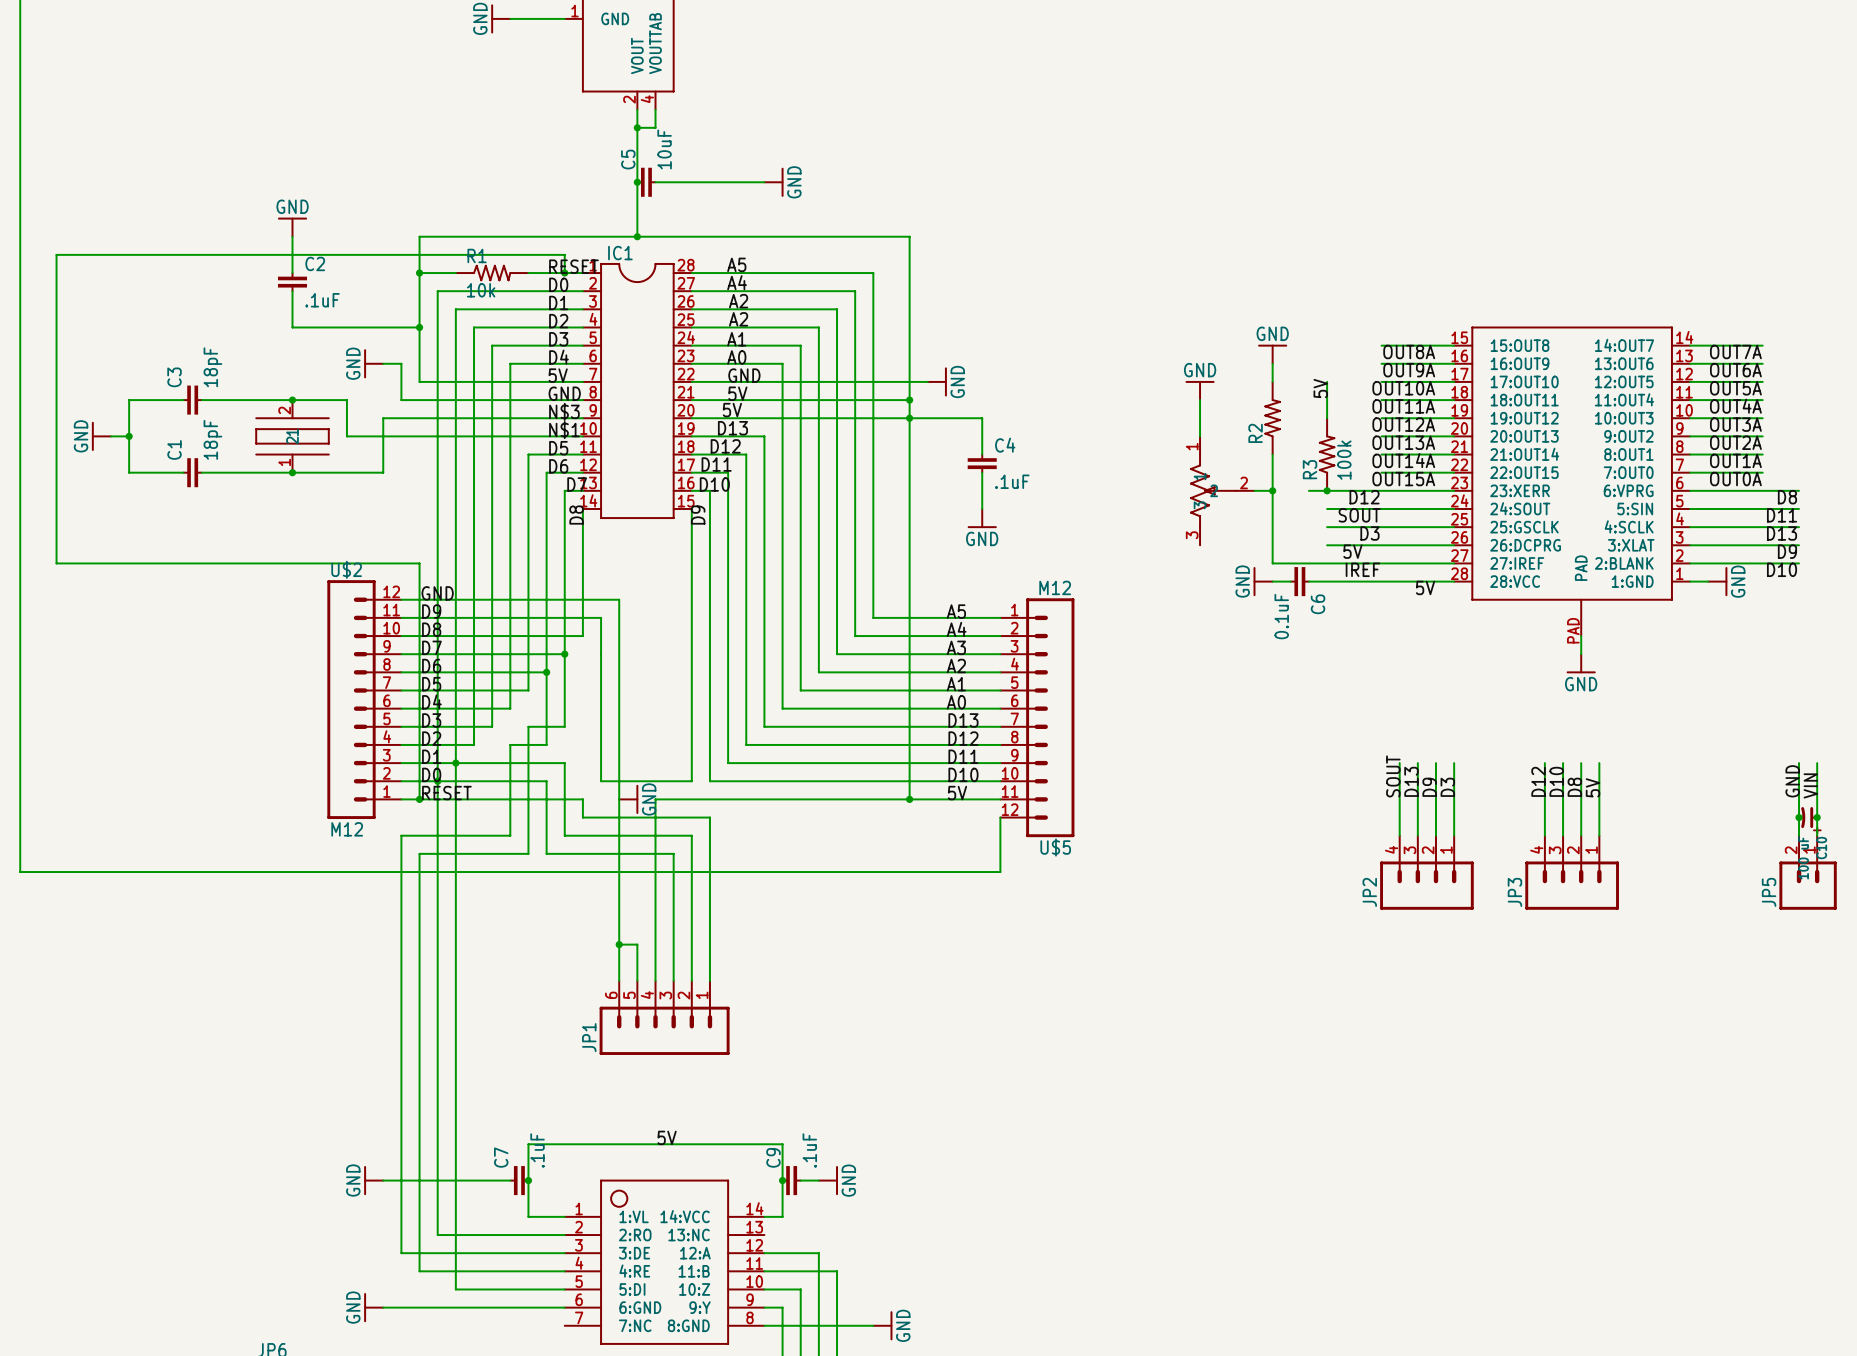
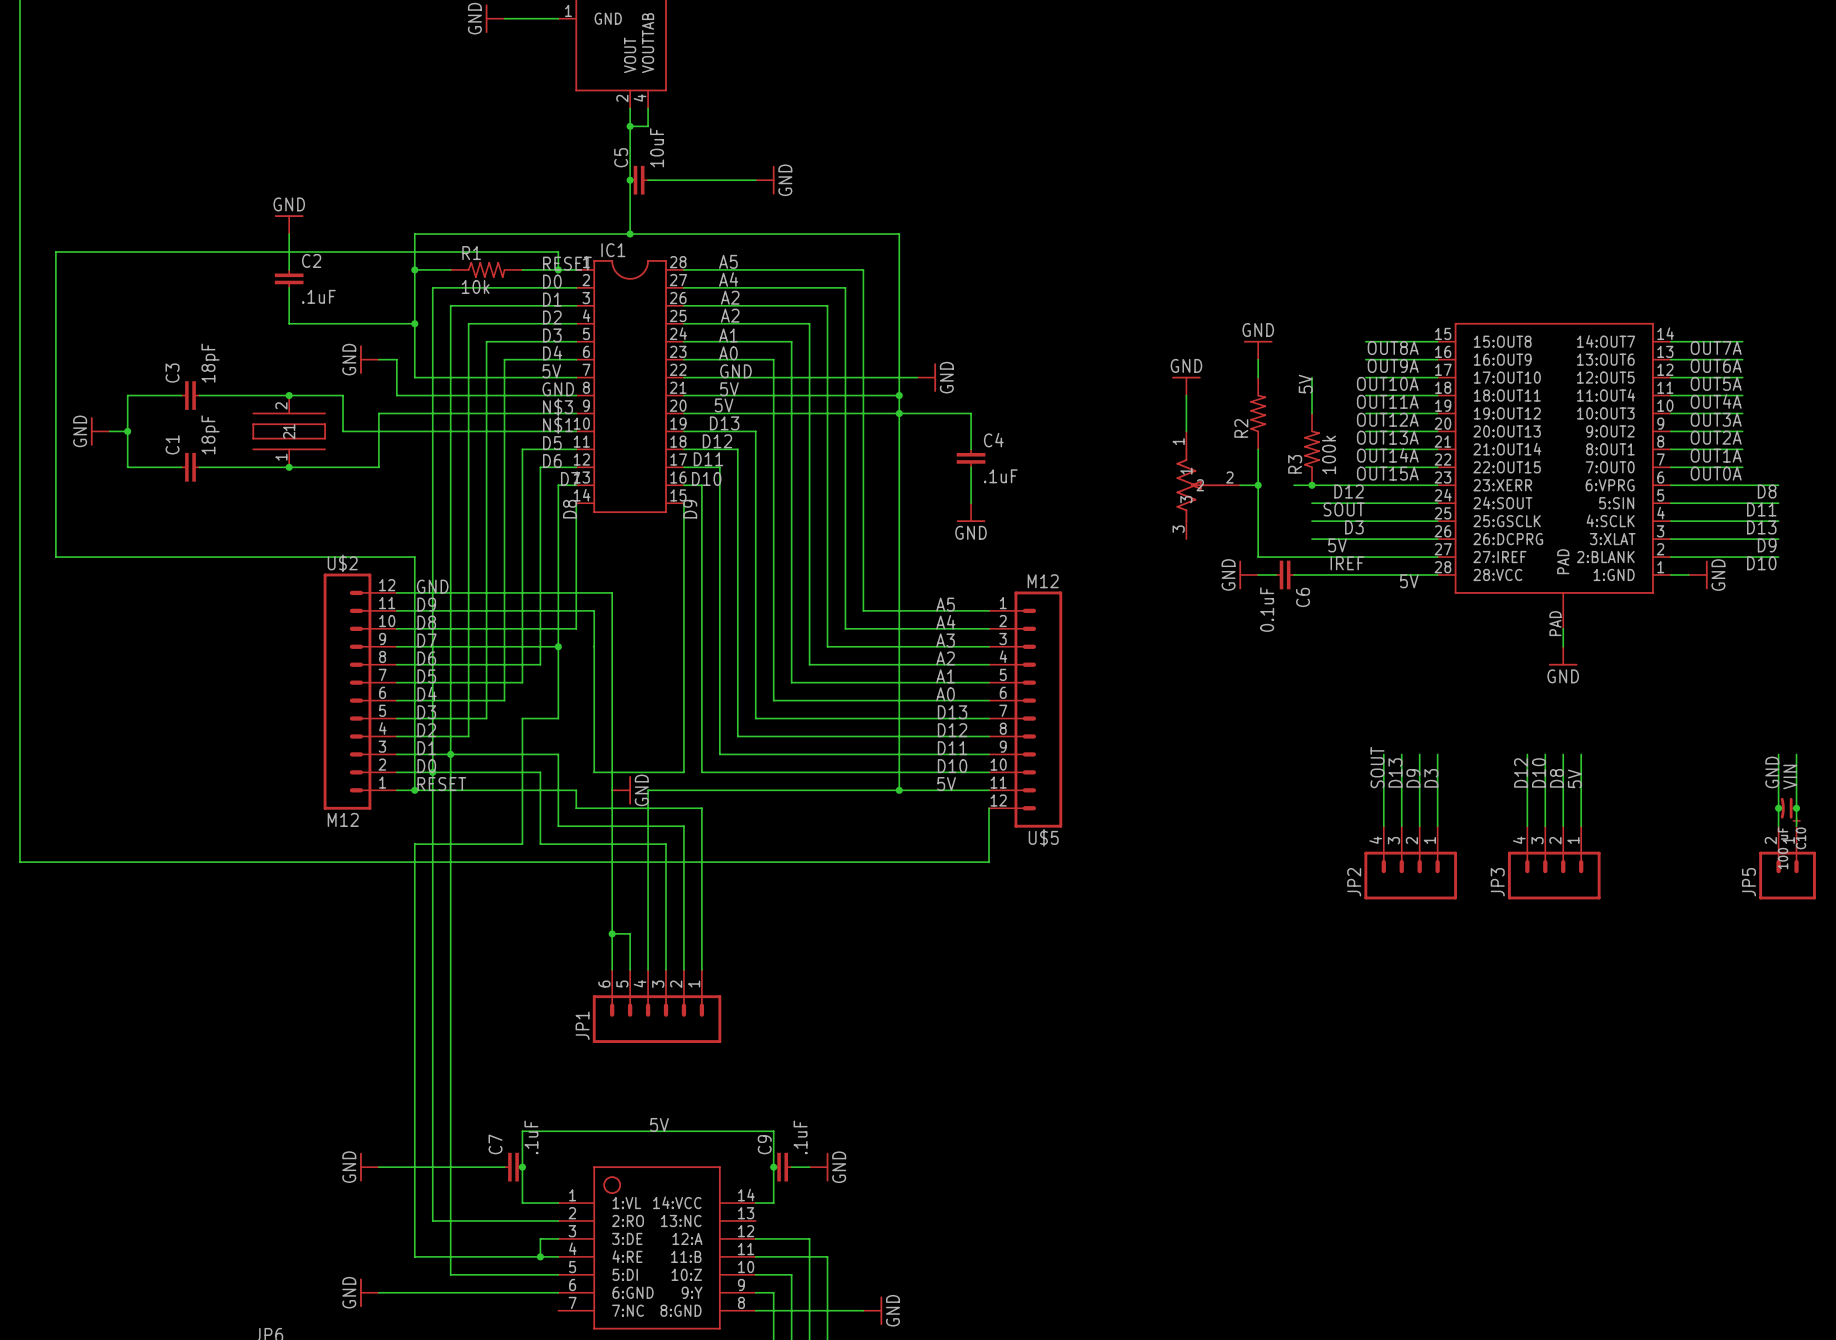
wire: (546, 672) (546, 744) (510, 744) (510, 835) (401, 835) (401, 1253) (546, 1253) -> (540, 1256) (540, 1238)
junction: (546, 672) -> none
junction: none -> (540, 1256)

